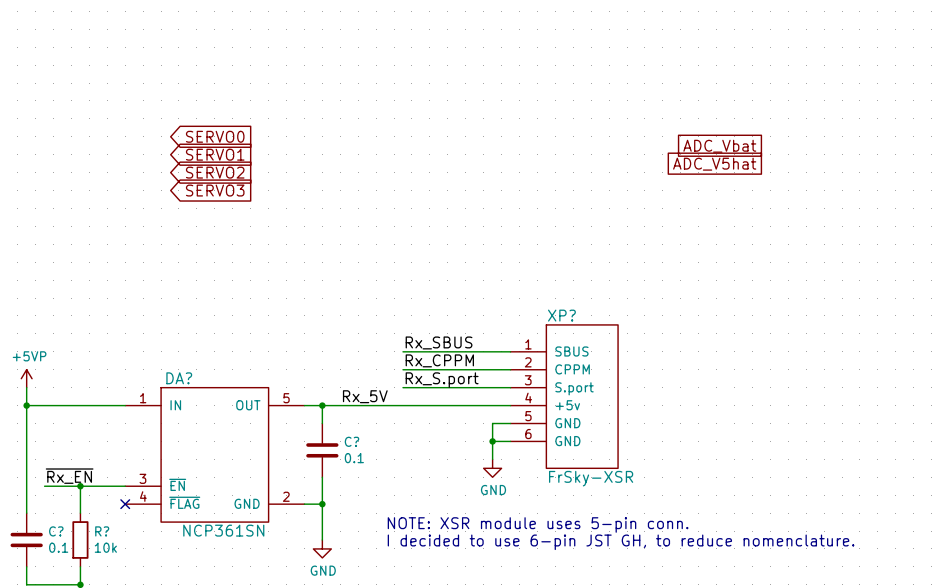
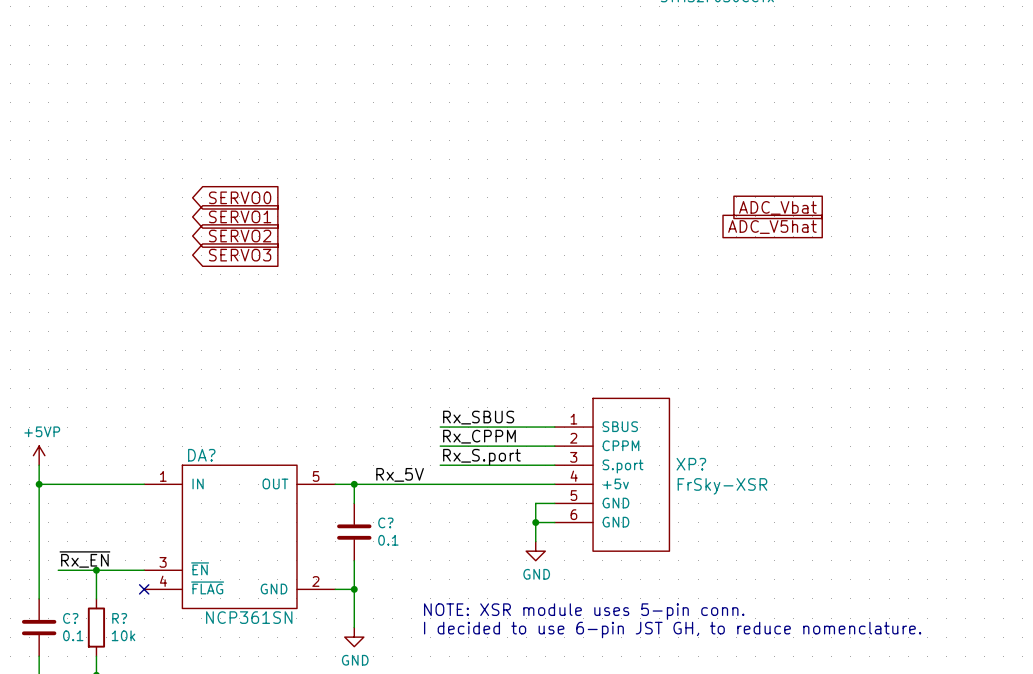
XP? name position: XP? (561, 315) -> XP? (691, 464)
XP? value position: FrSky-XSR (591, 478) -> FrSky-XSR (722, 486)

